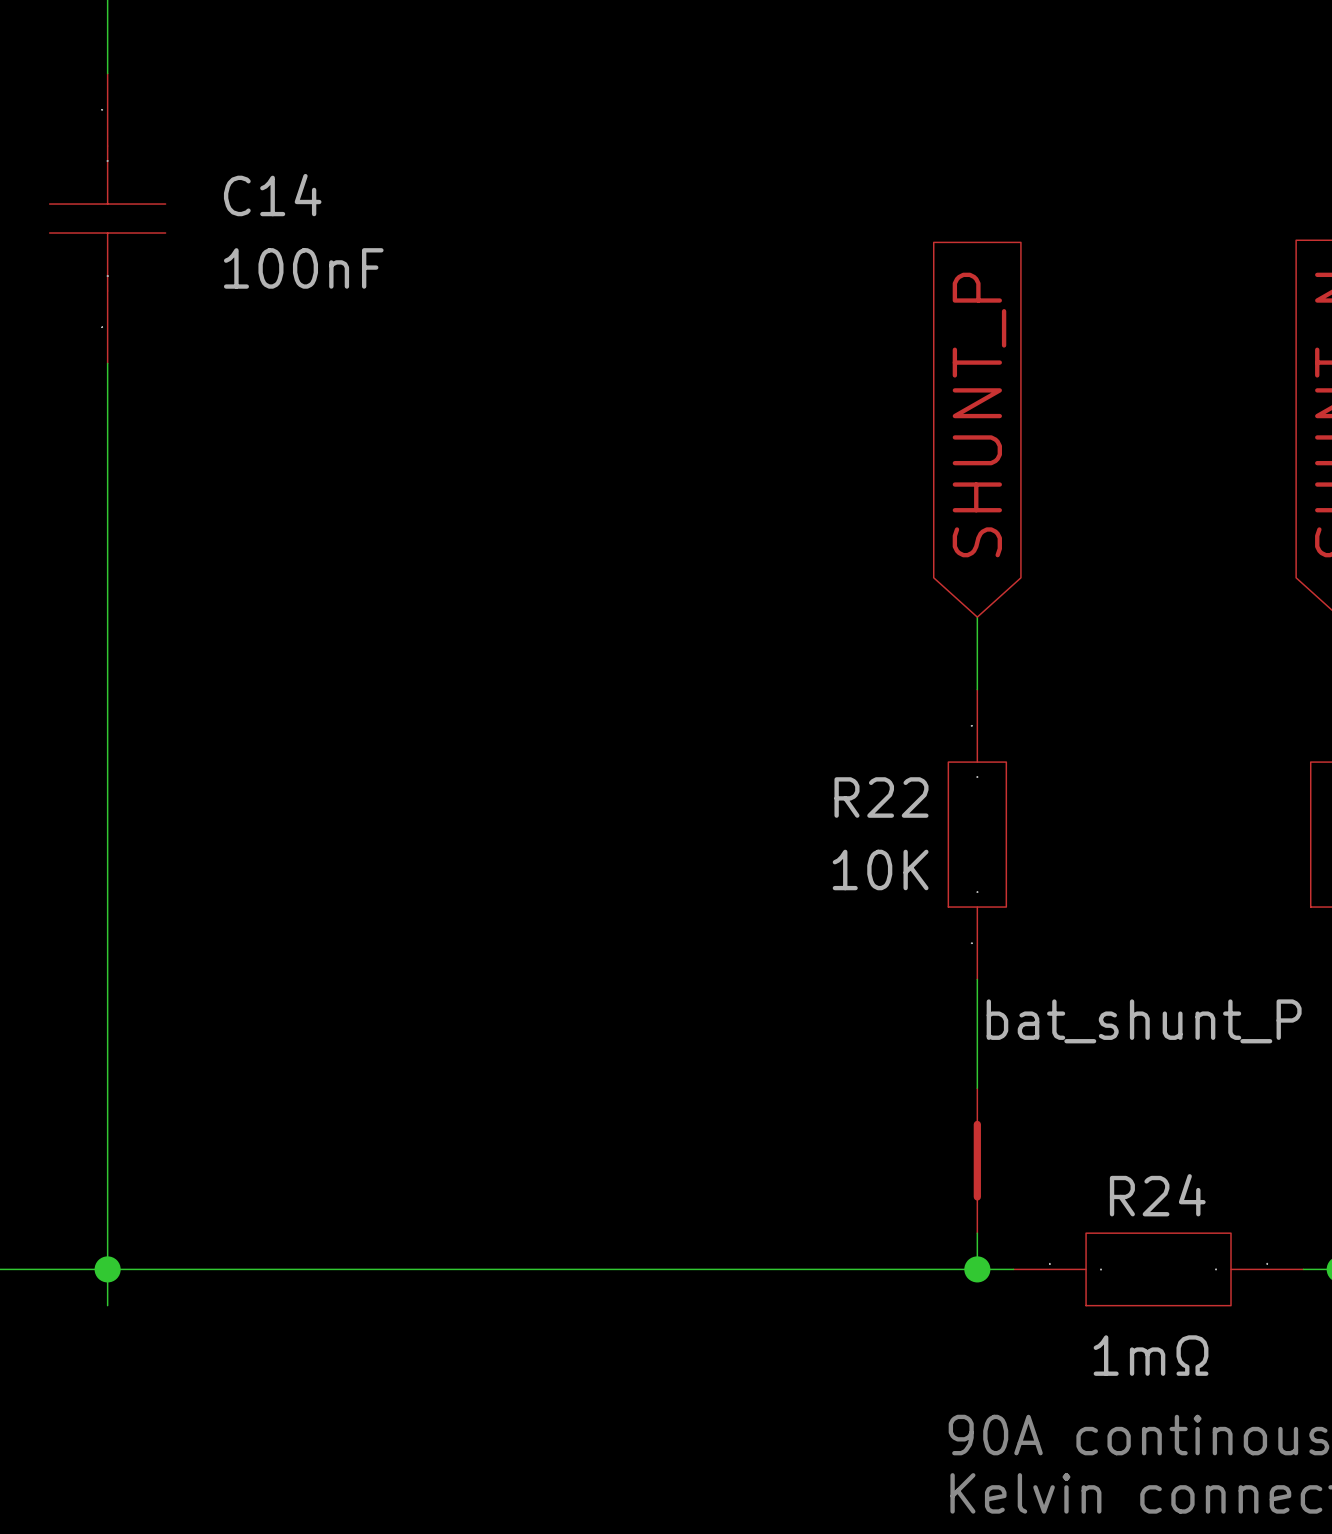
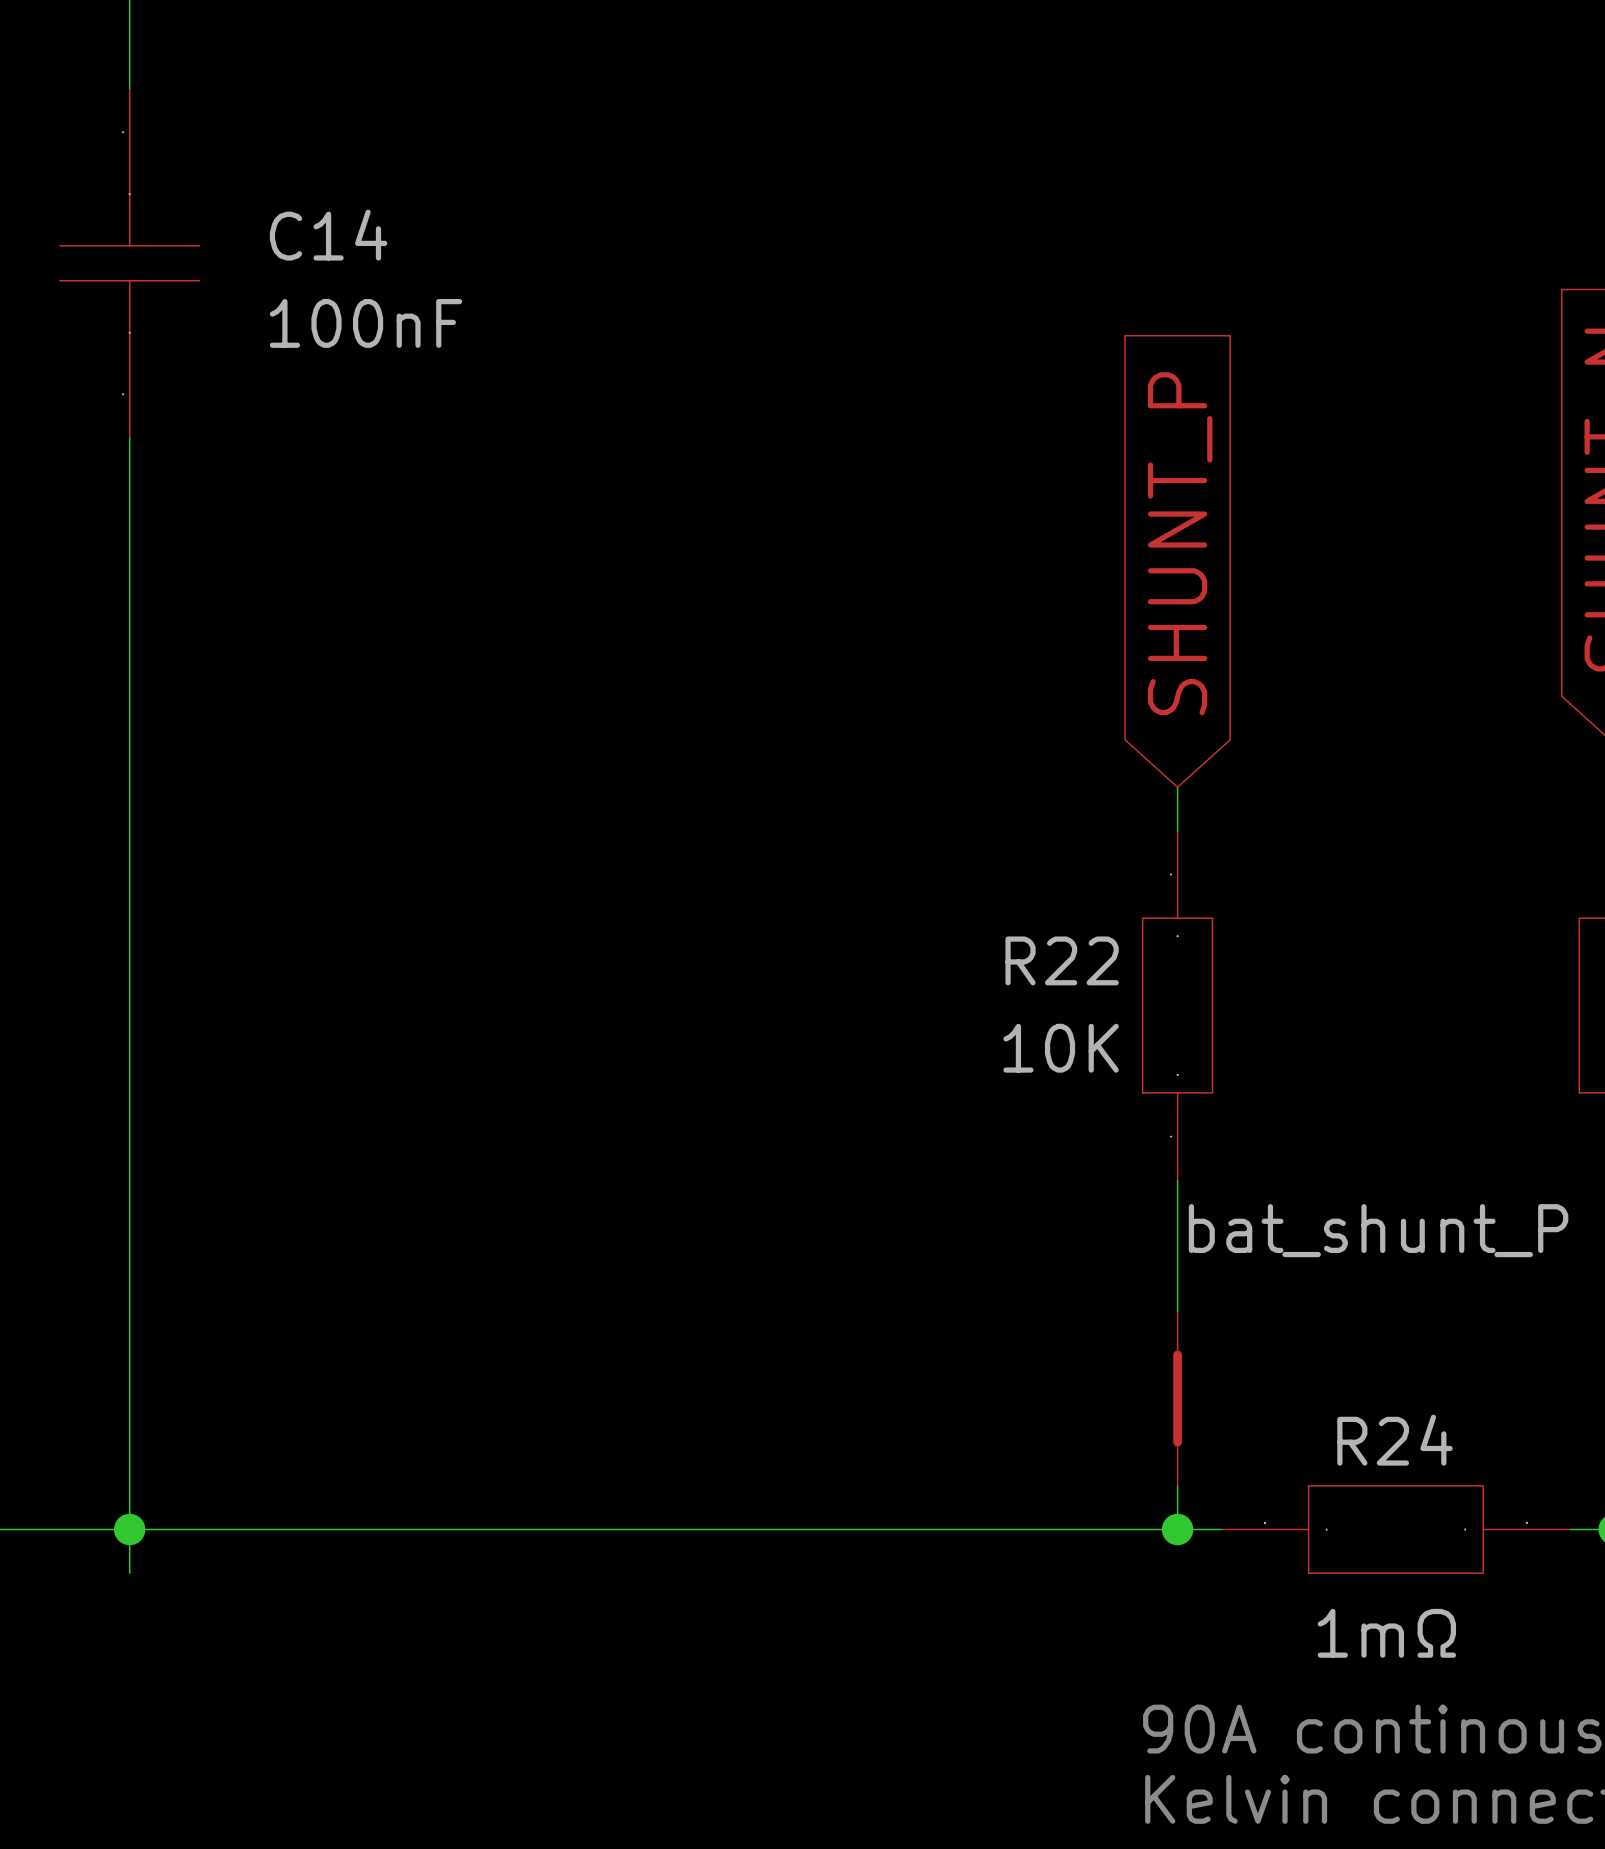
global label position: SHUNT_P (979, 415) -> SHUNT_P (1180, 543)
wire: (977, 617) (977, 653) -> none

